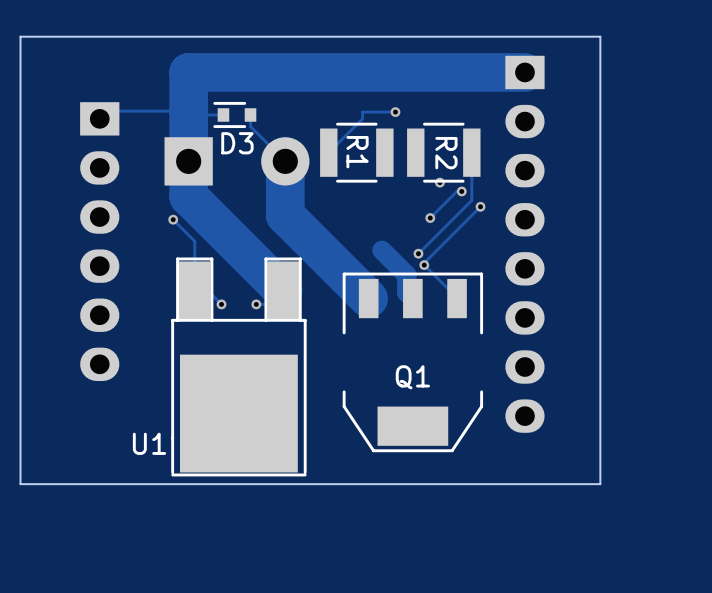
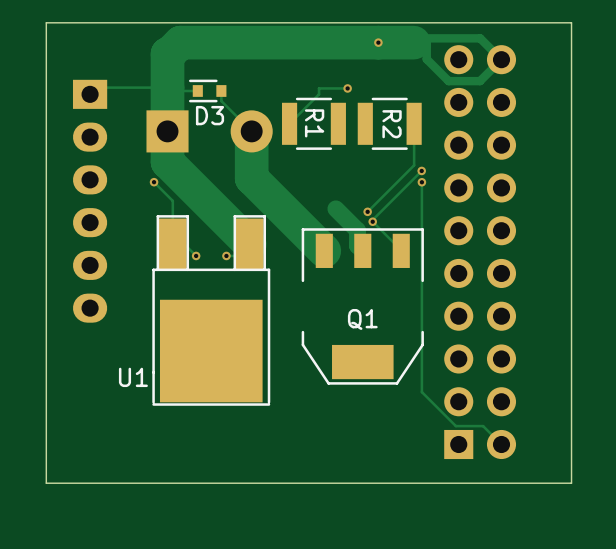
board edge: (600, 36) (600, 484) (20, 484) (20, 36) (49, 36) -> (526, 22) (571, 22) (571, 483) (46, 483) (46, 22)
track: none -> (413, 38) (480, 38) (501, 59) (480, 81) (448, 81) (426, 59) (426, 42)
via: none -> (378, 42)
track: (524, 72) (190, 72) -> (413, 42) (180, 42) (169, 53)
via: (439, 182) -> none
track: (461, 191) (456, 191) (430, 218) -> none
via: (461, 191) -> none
via: (430, 218) -> none
track: none -> (421, 182) (421, 392) (455, 426) (483, 426) (501, 444)
via: none -> (421, 182)
part: (524, 244) -> none
part: none -> (480, 252)

